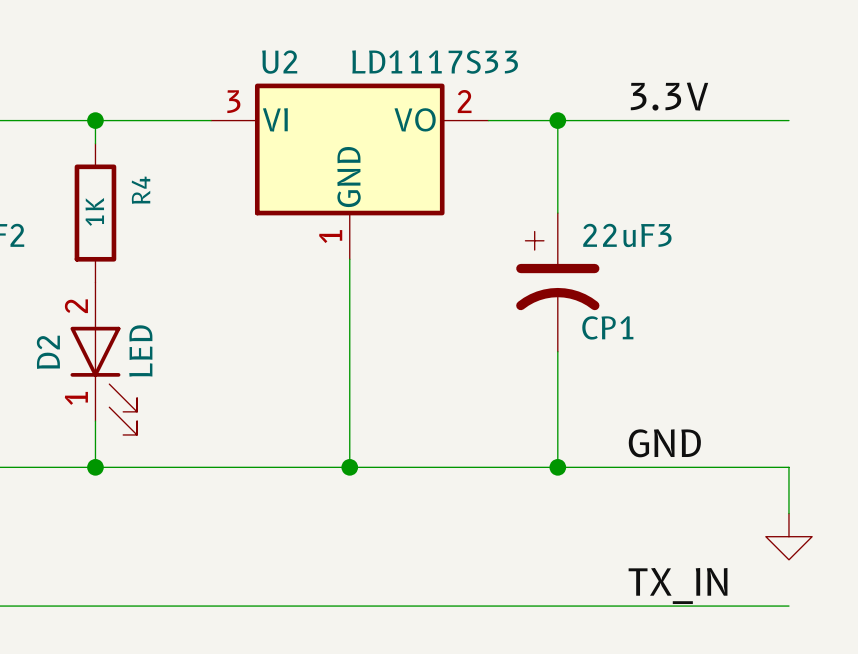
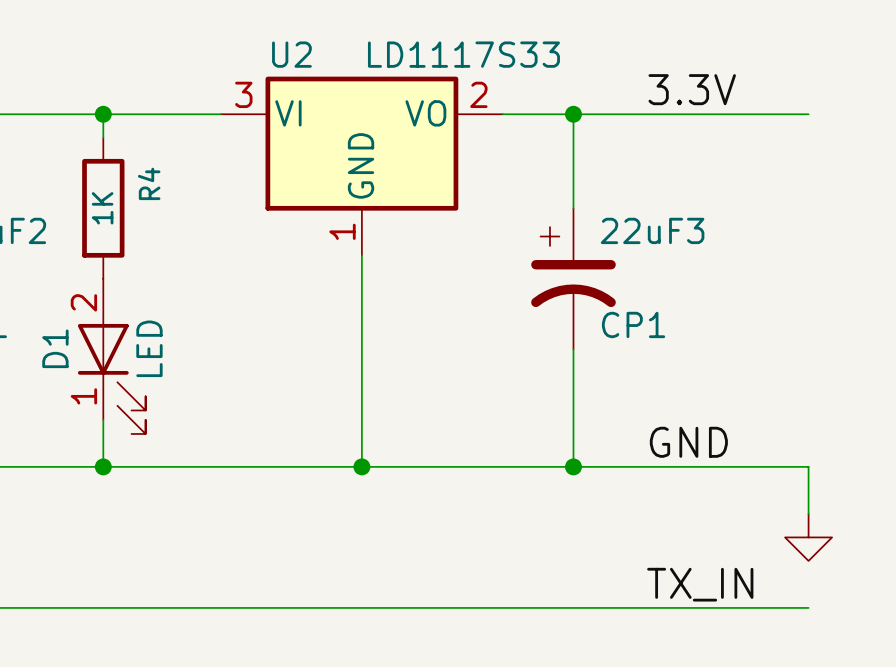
D2 name: D2 (48, 352) -> D1 (55, 348)

